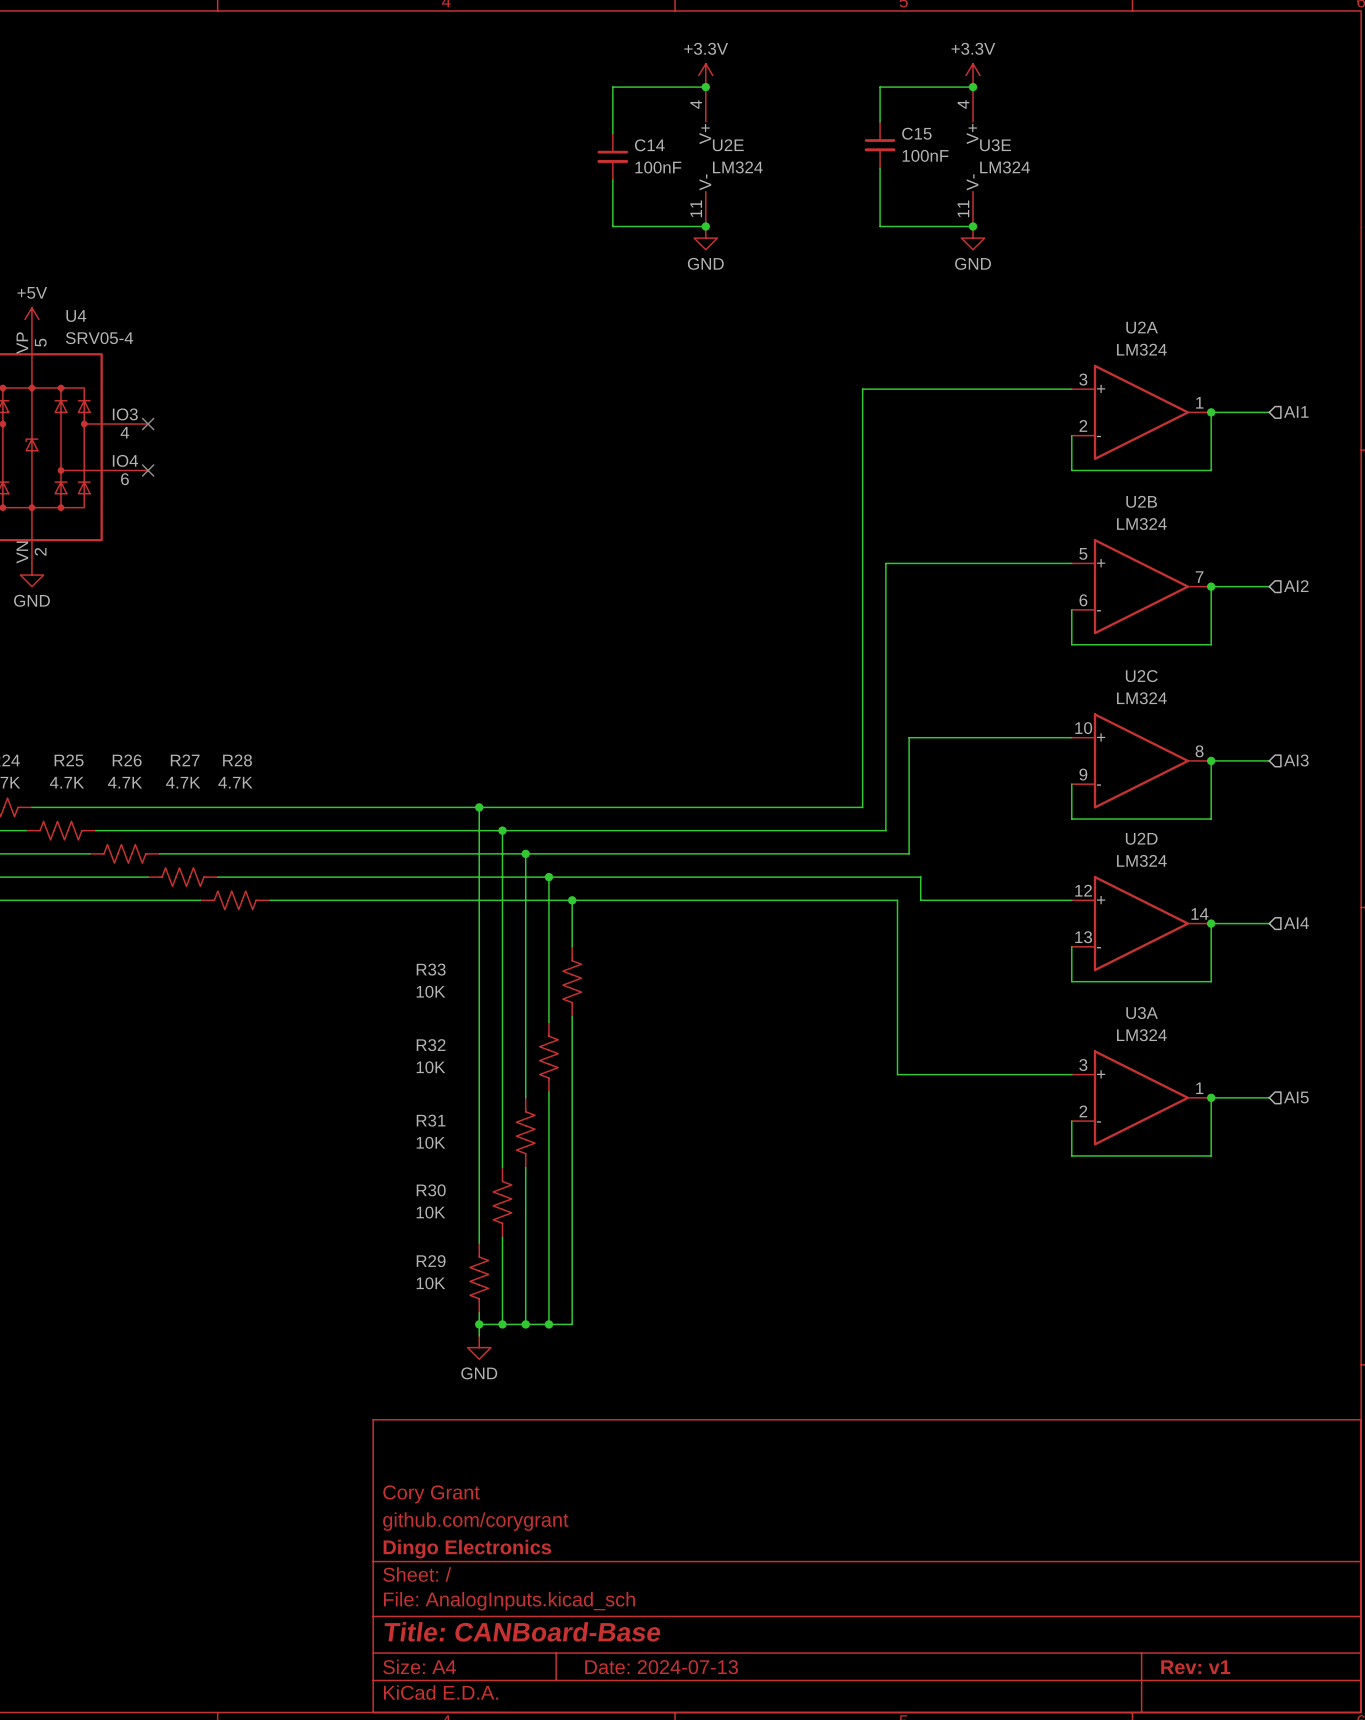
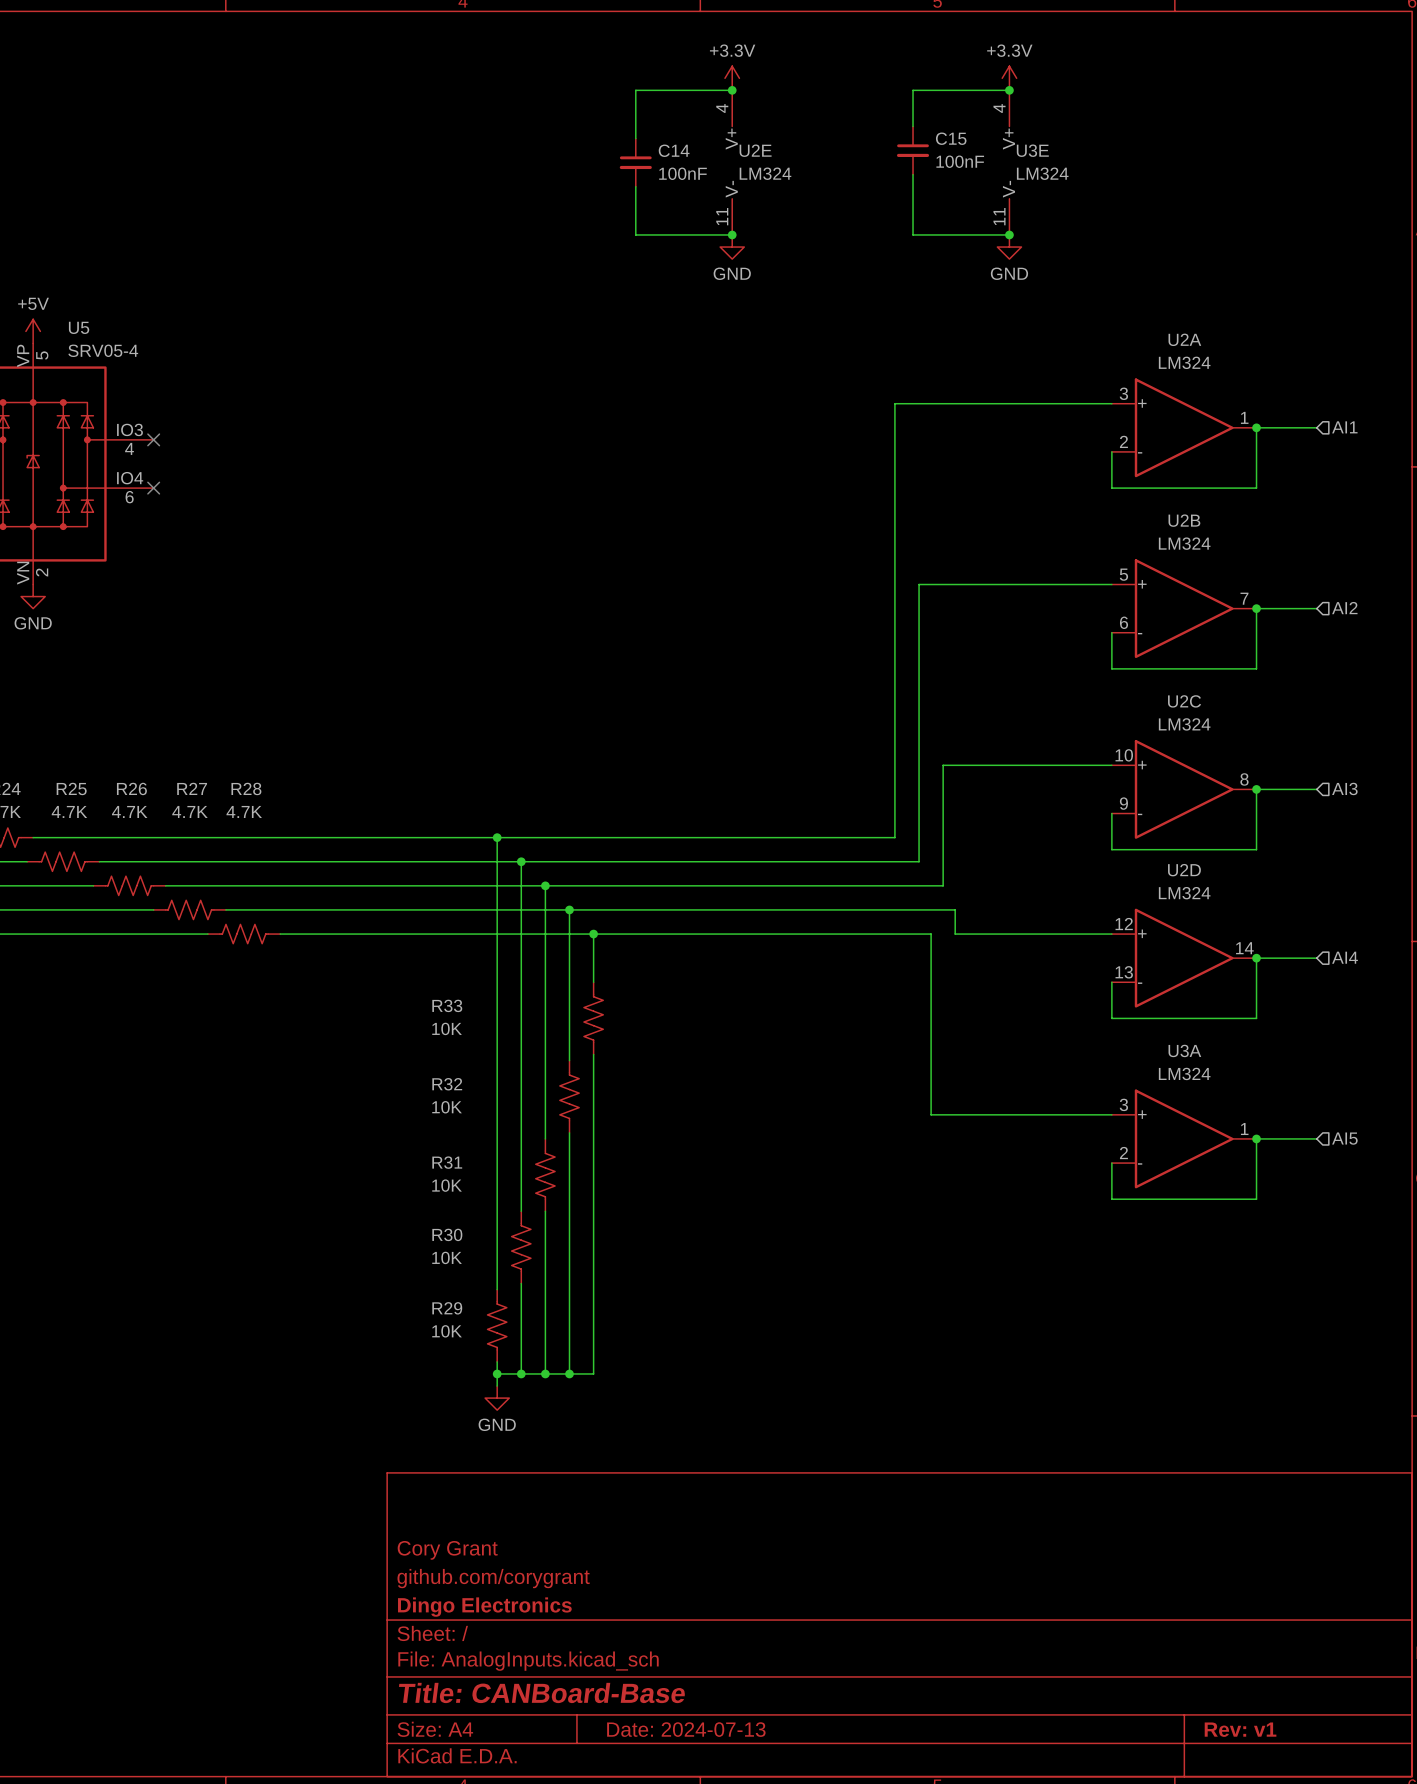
U4 name: U4 (76, 316) -> U5 (79, 327)

